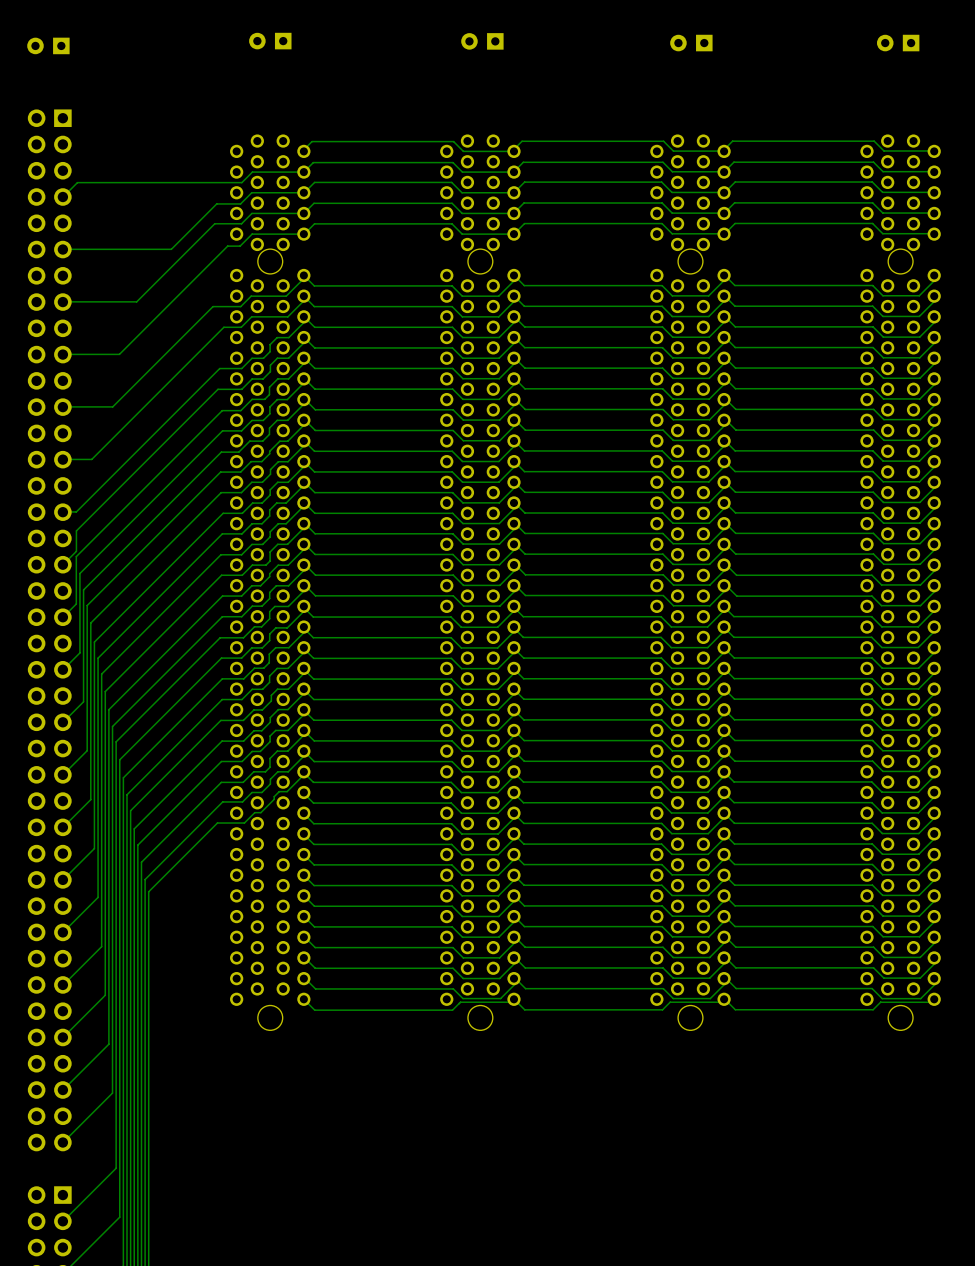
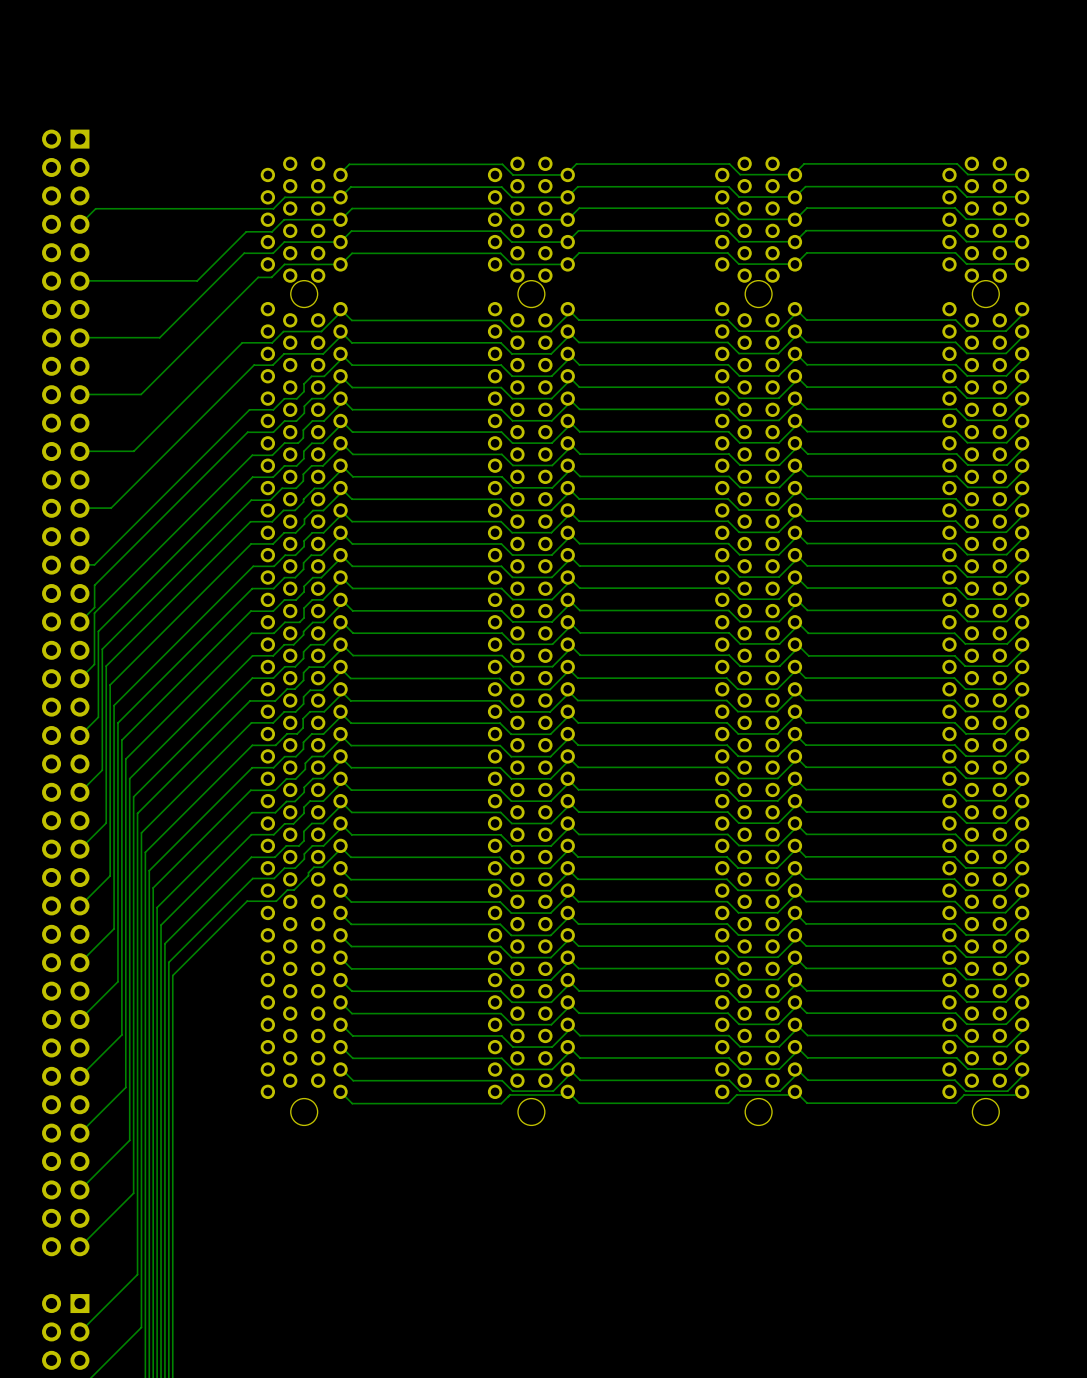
part: (270, 41) -> none
part: (482, 41) -> none
part: (691, 43) -> none
part: (898, 43) -> none
part: (48, 45) -> none

